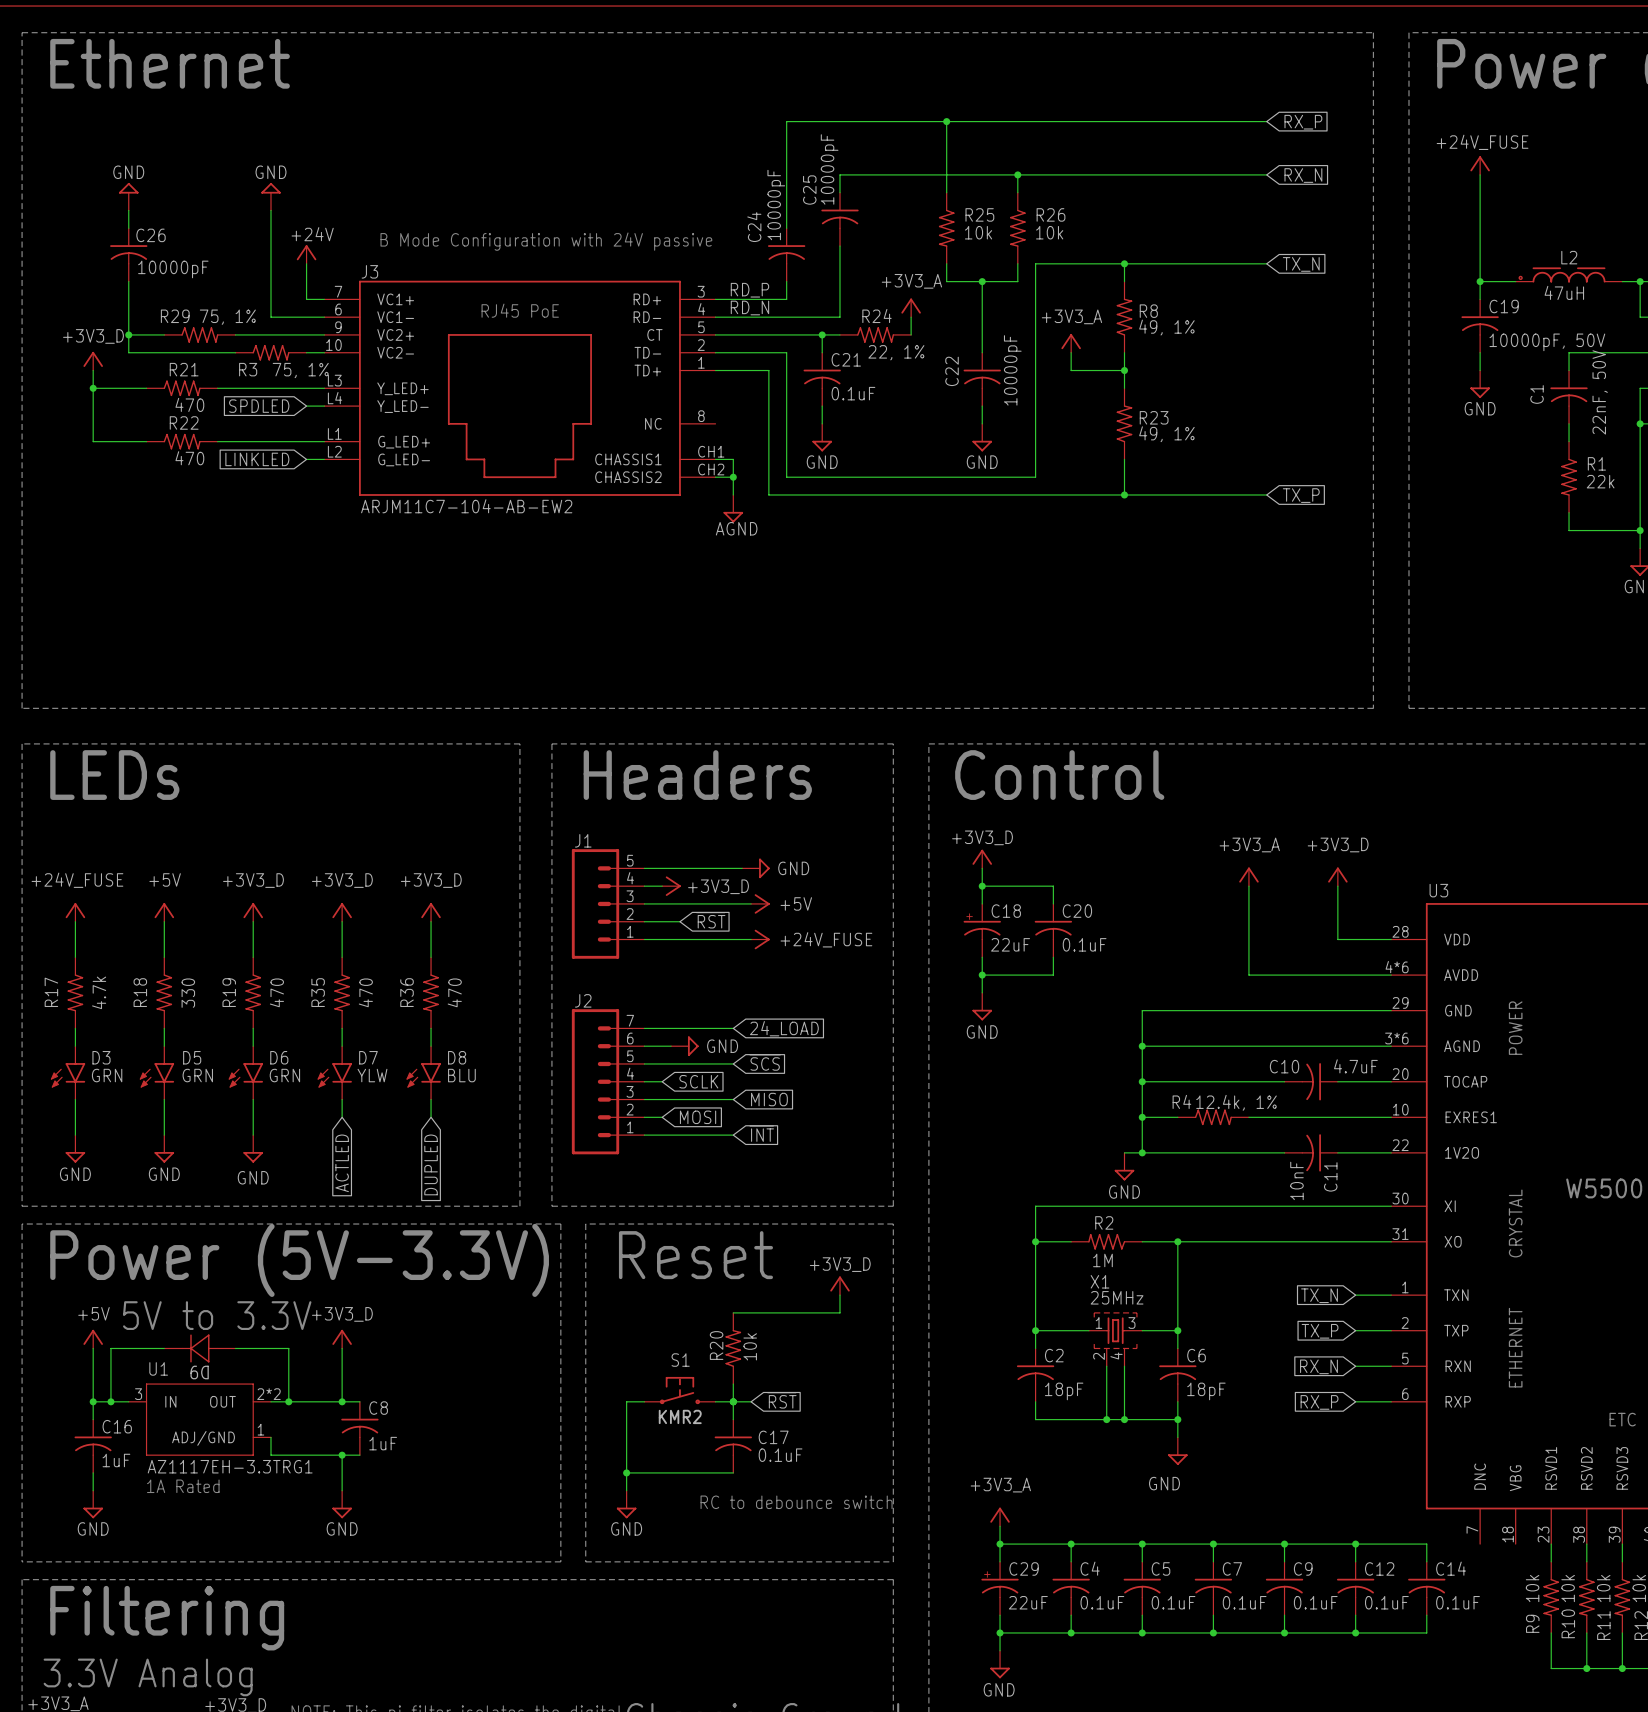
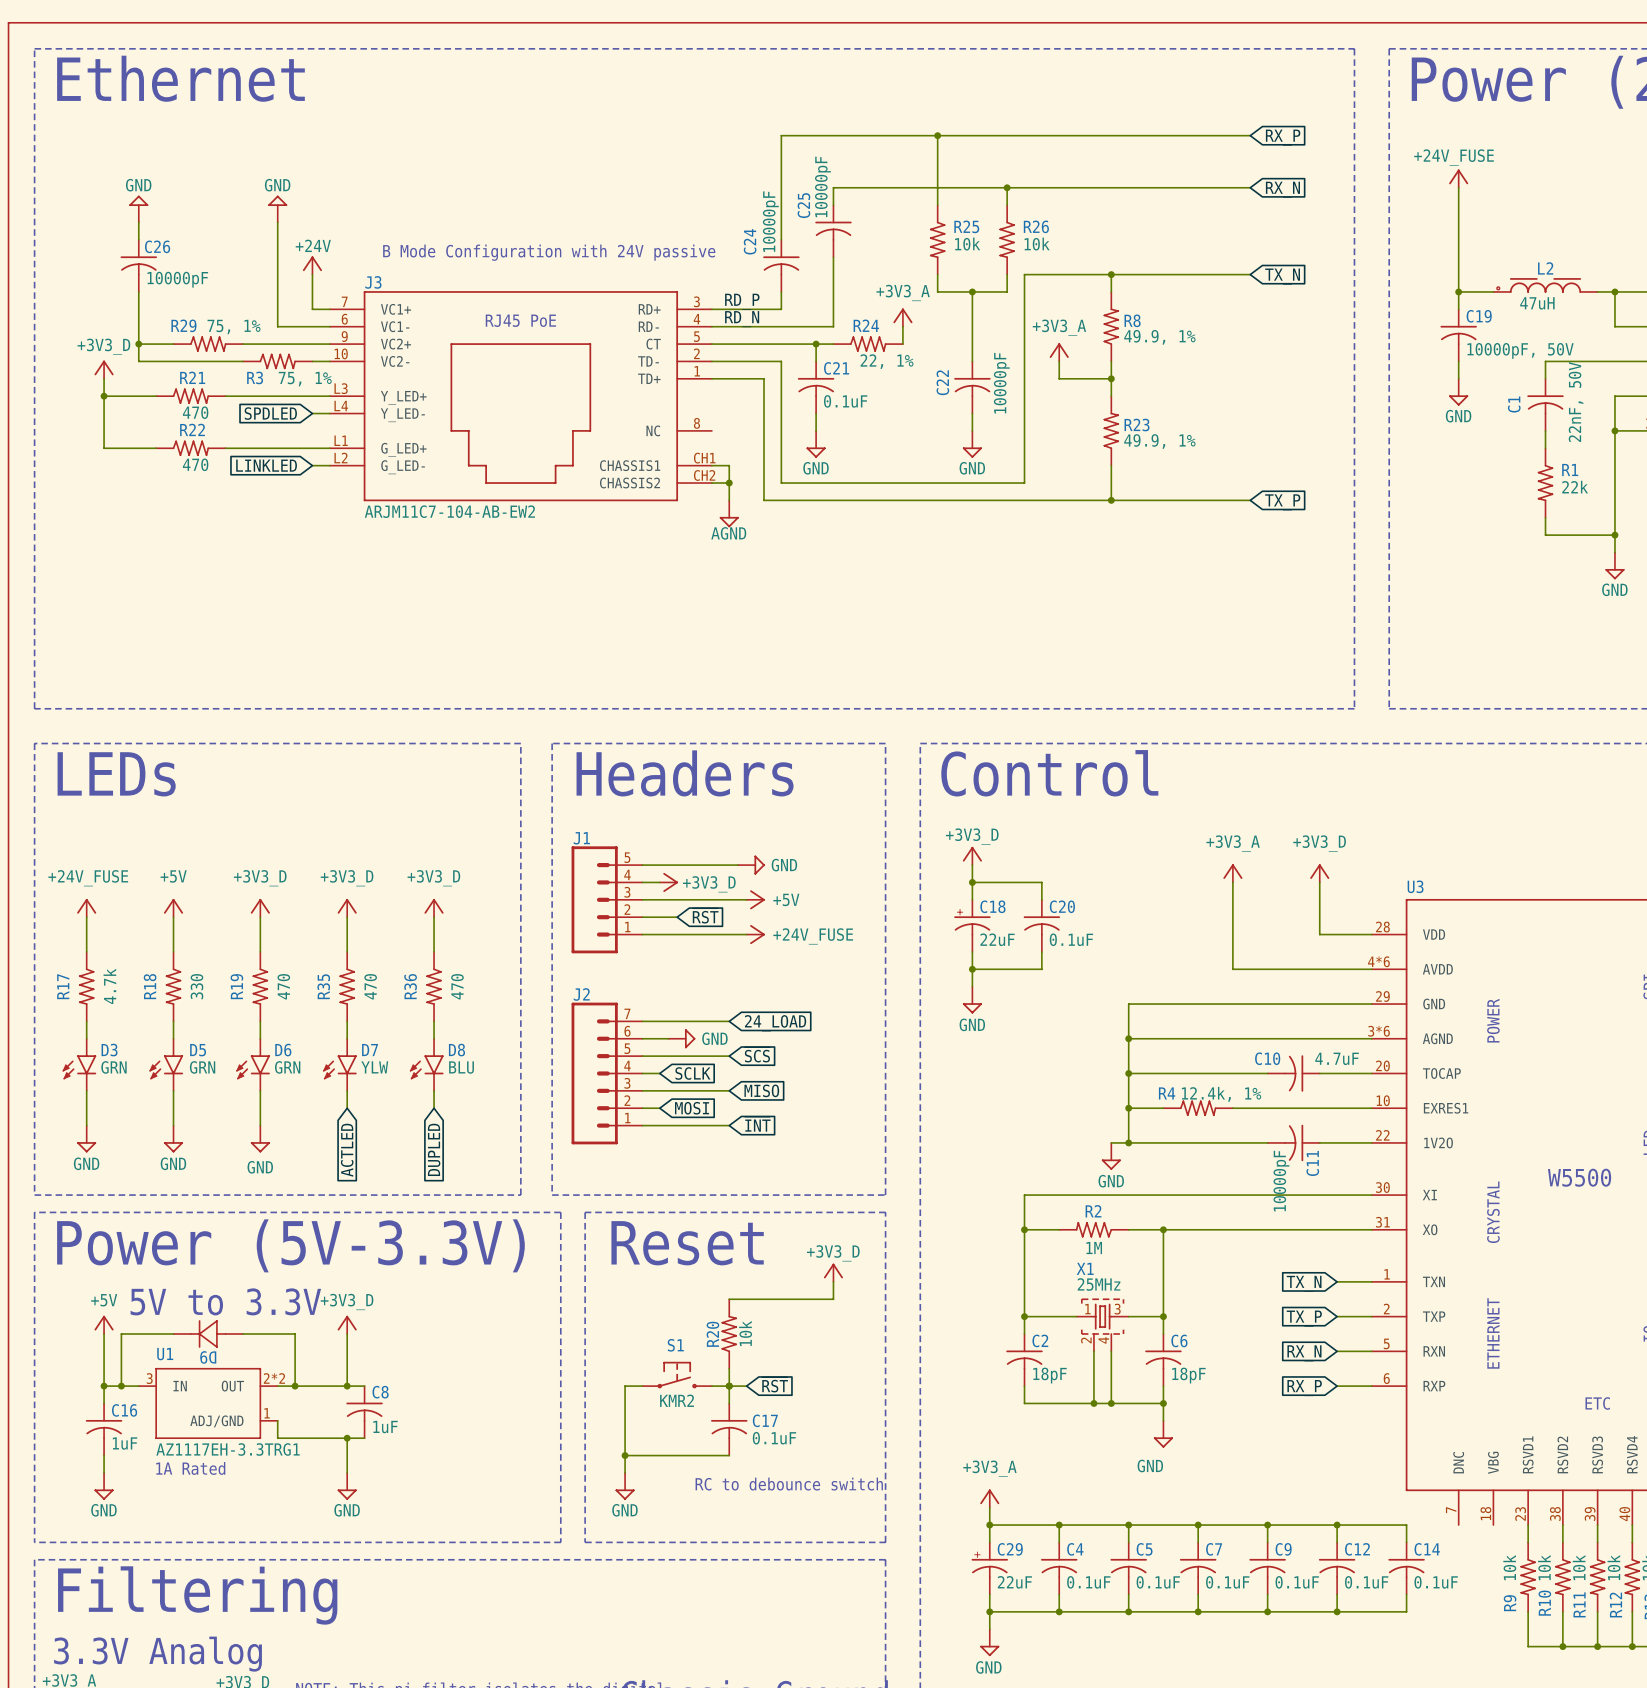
R8 value: 49, 1% (1166, 327) -> 49.9, 1% (1159, 337)
R23 value: 49, 1% (1166, 434) -> 49.9, 1% (1159, 441)
C11 value: 10nF (1296, 1180) -> 10000pF (1281, 1181)

